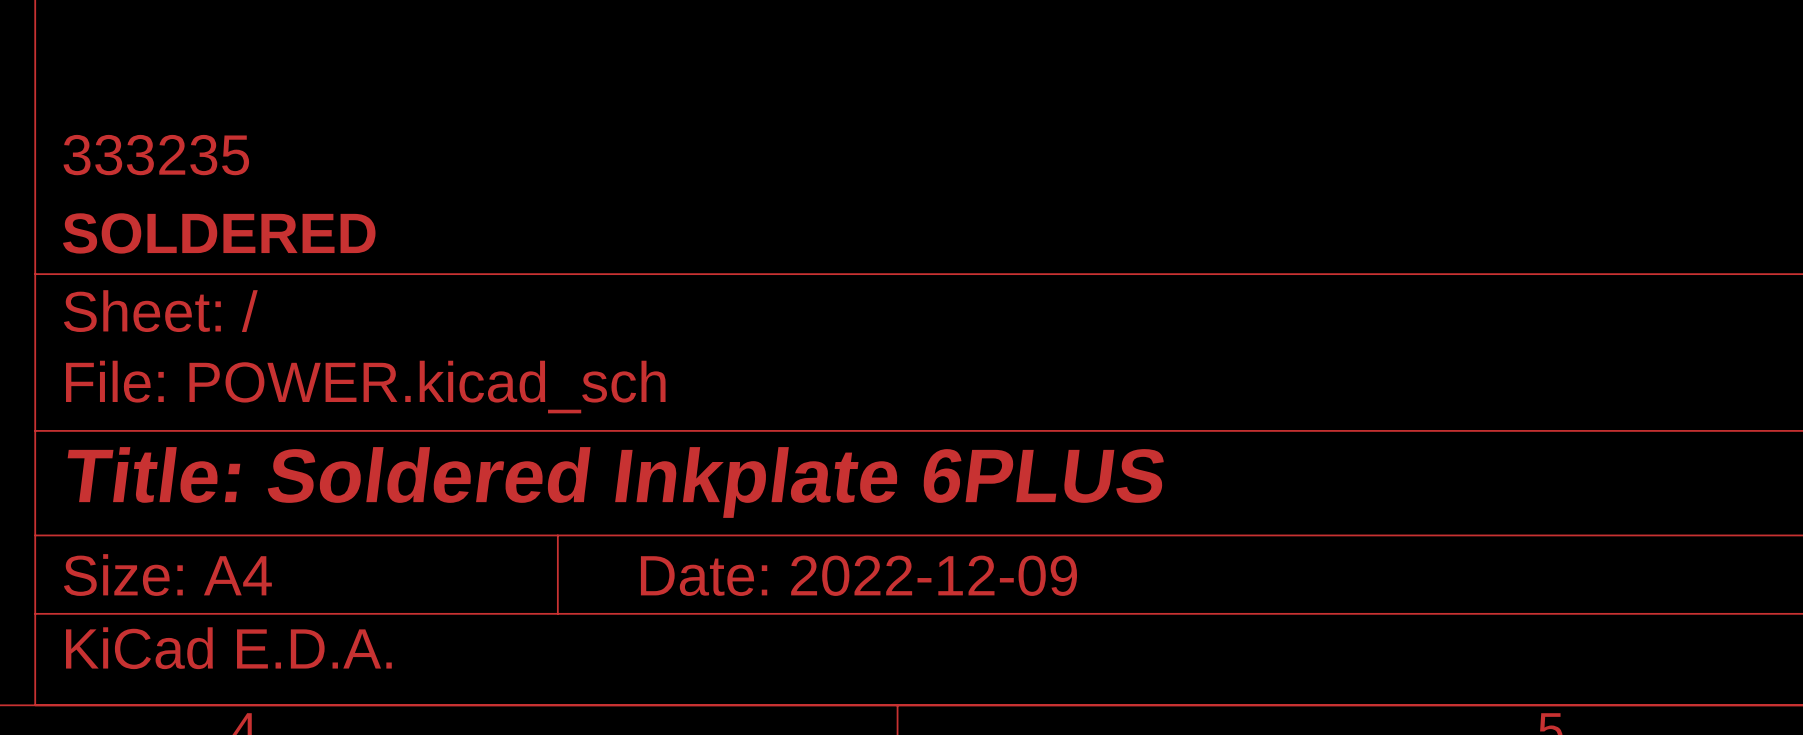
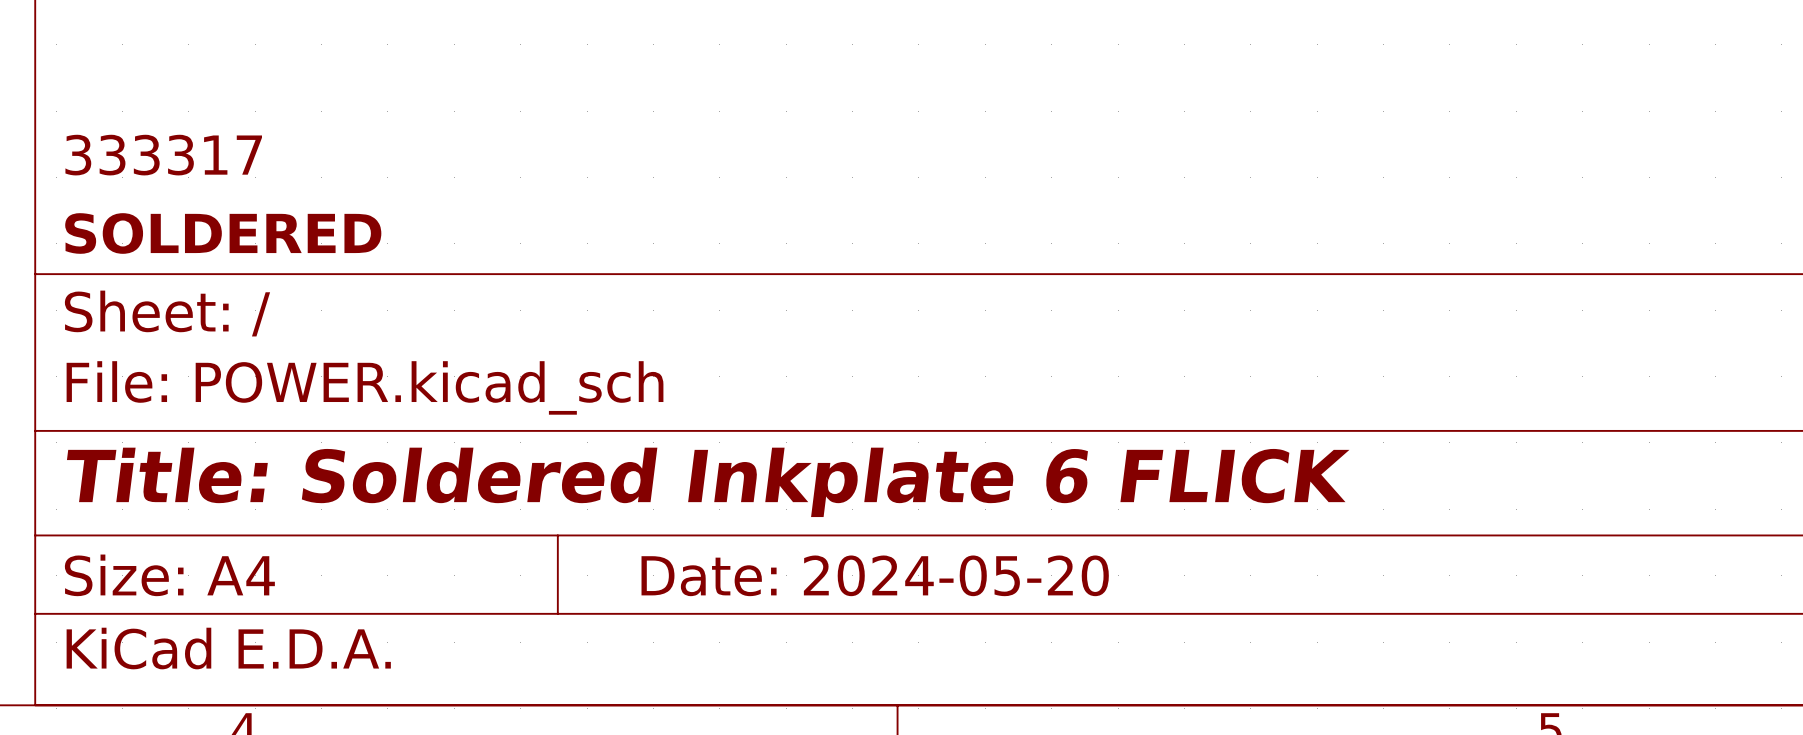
title block: 333235 (156, 155) -> 333317 (163, 155)
title block: Title: Soldered Inkplate 6PLUS (615, 482) -> Title: Soldered Inkplate 6 FLICK (708, 482)
title block: Date: 2022-12-09 (858, 575) -> Date: 2024-05-20 (875, 575)

